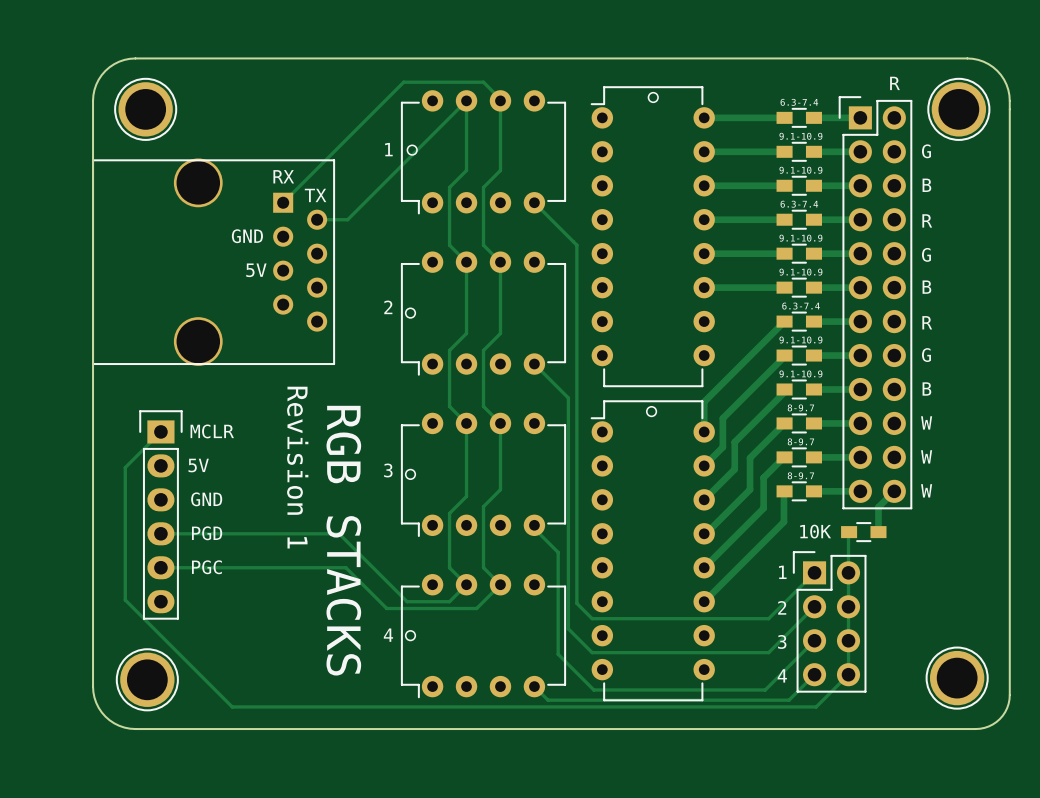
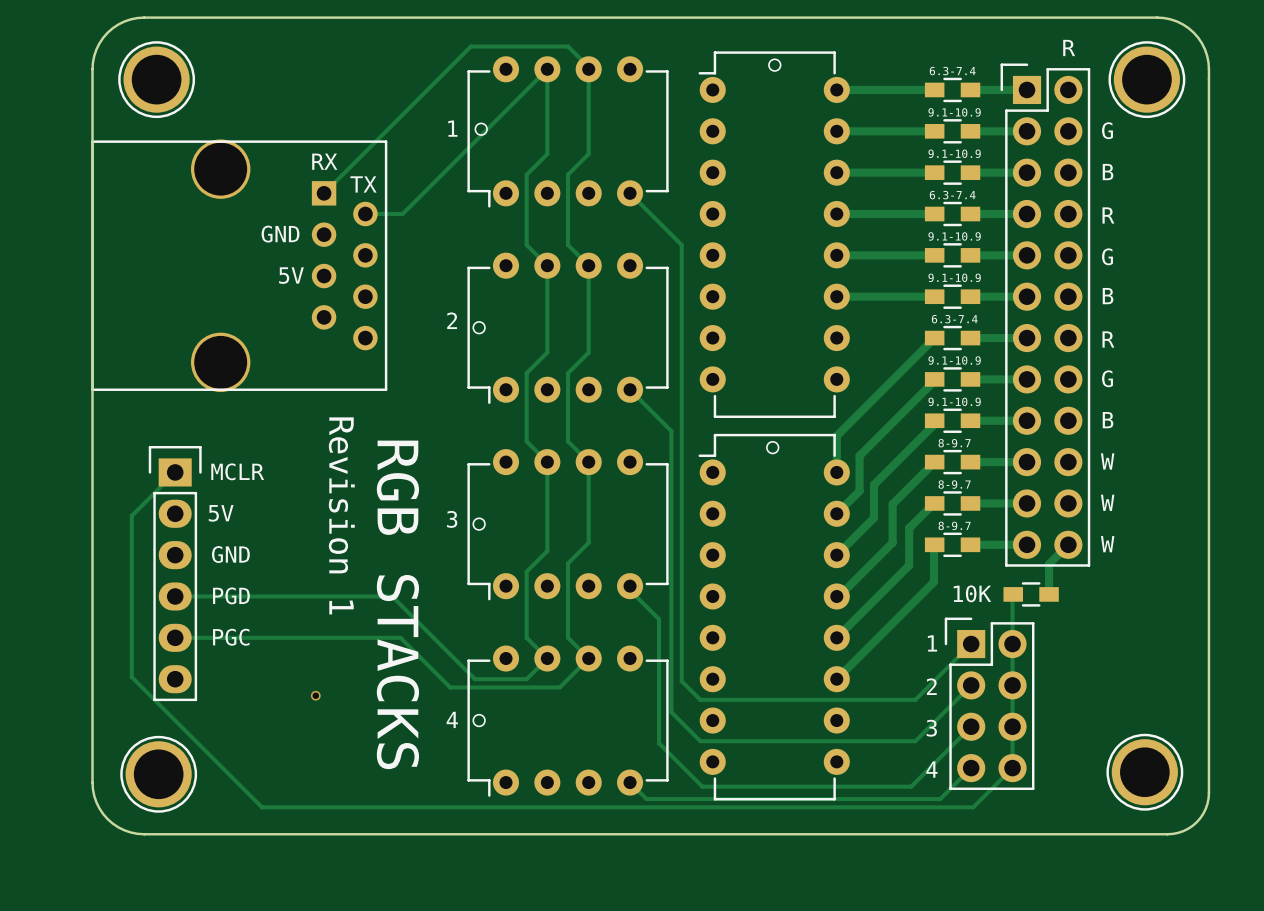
via: none -> (315, 695)

